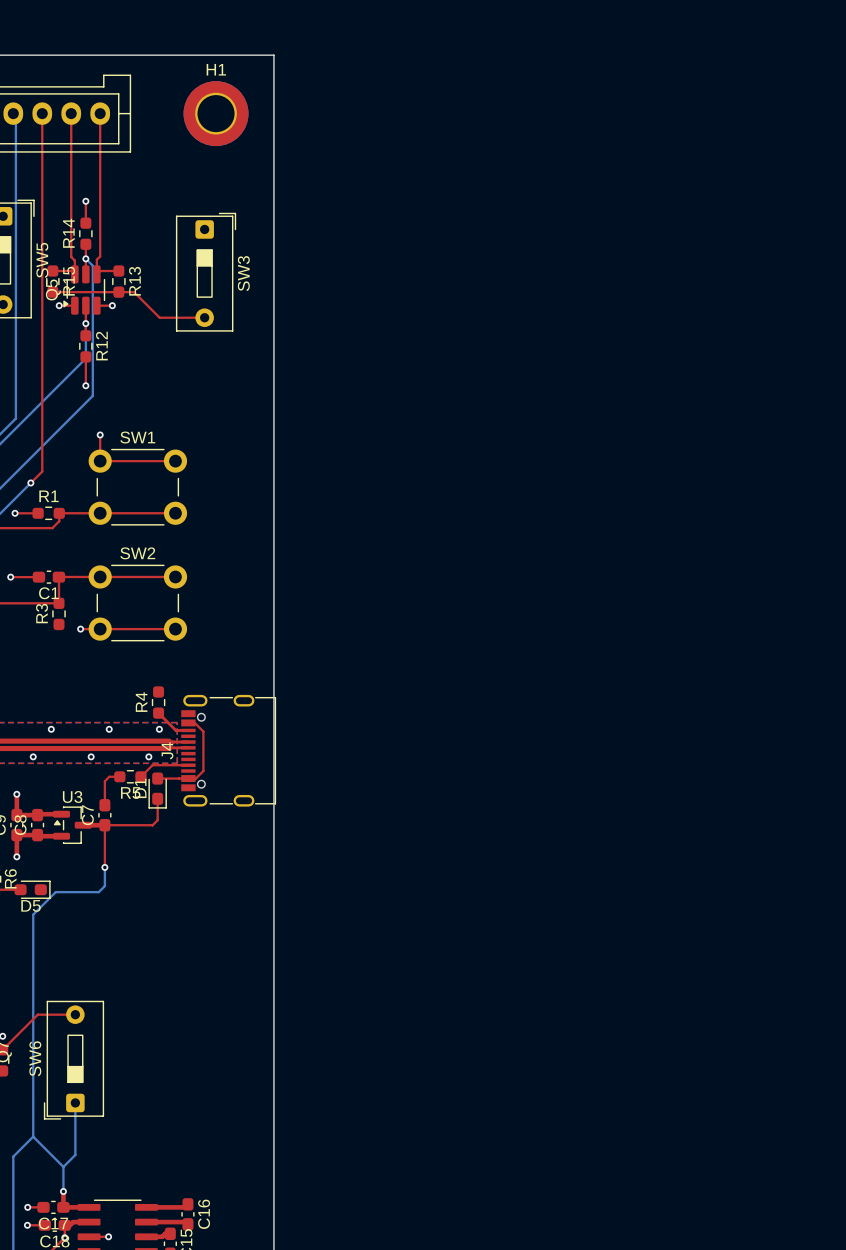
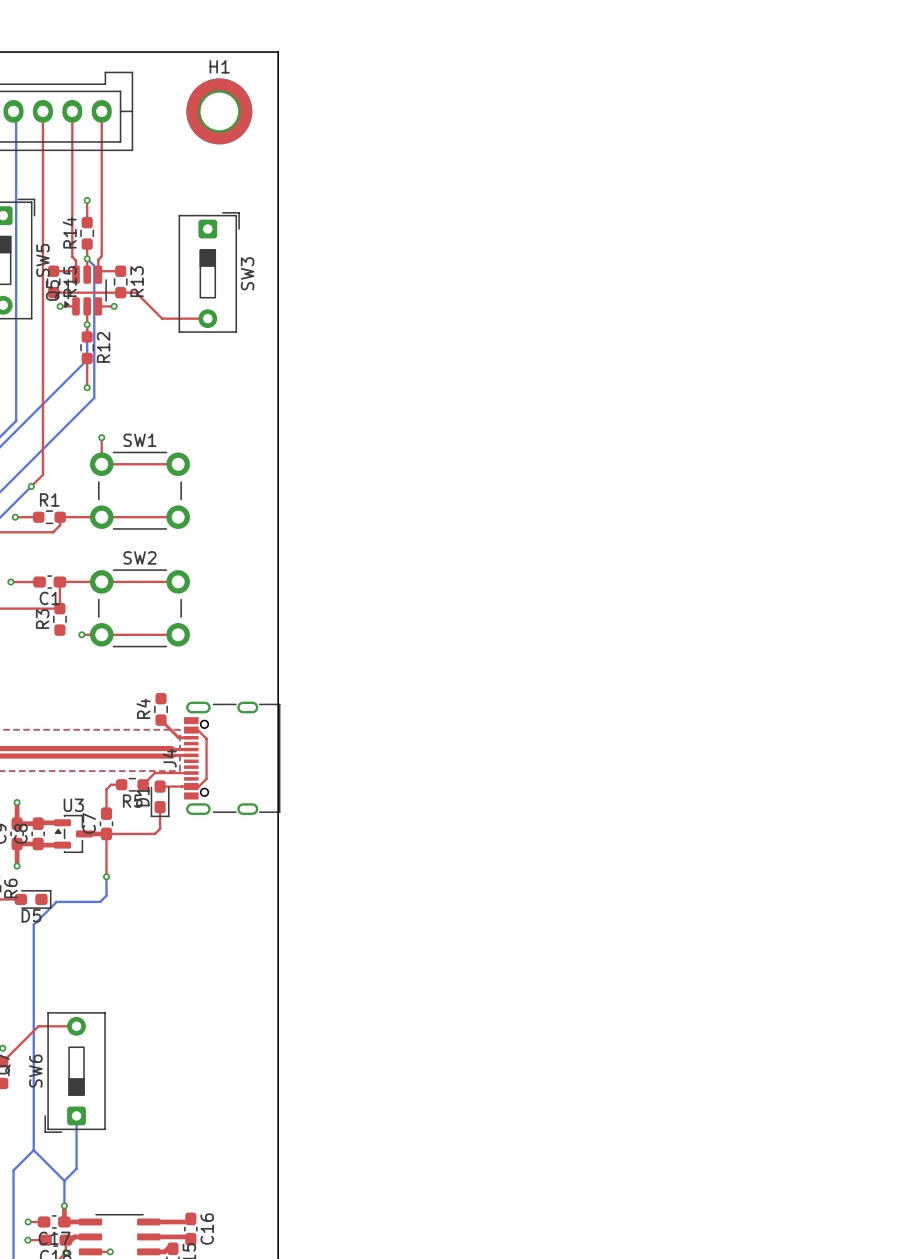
via: (51, 729) -> none
via: (109, 729) -> none
via: (159, 729) -> none
via: (33, 756) -> none
via: (91, 756) -> none
via: (148, 756) -> none

